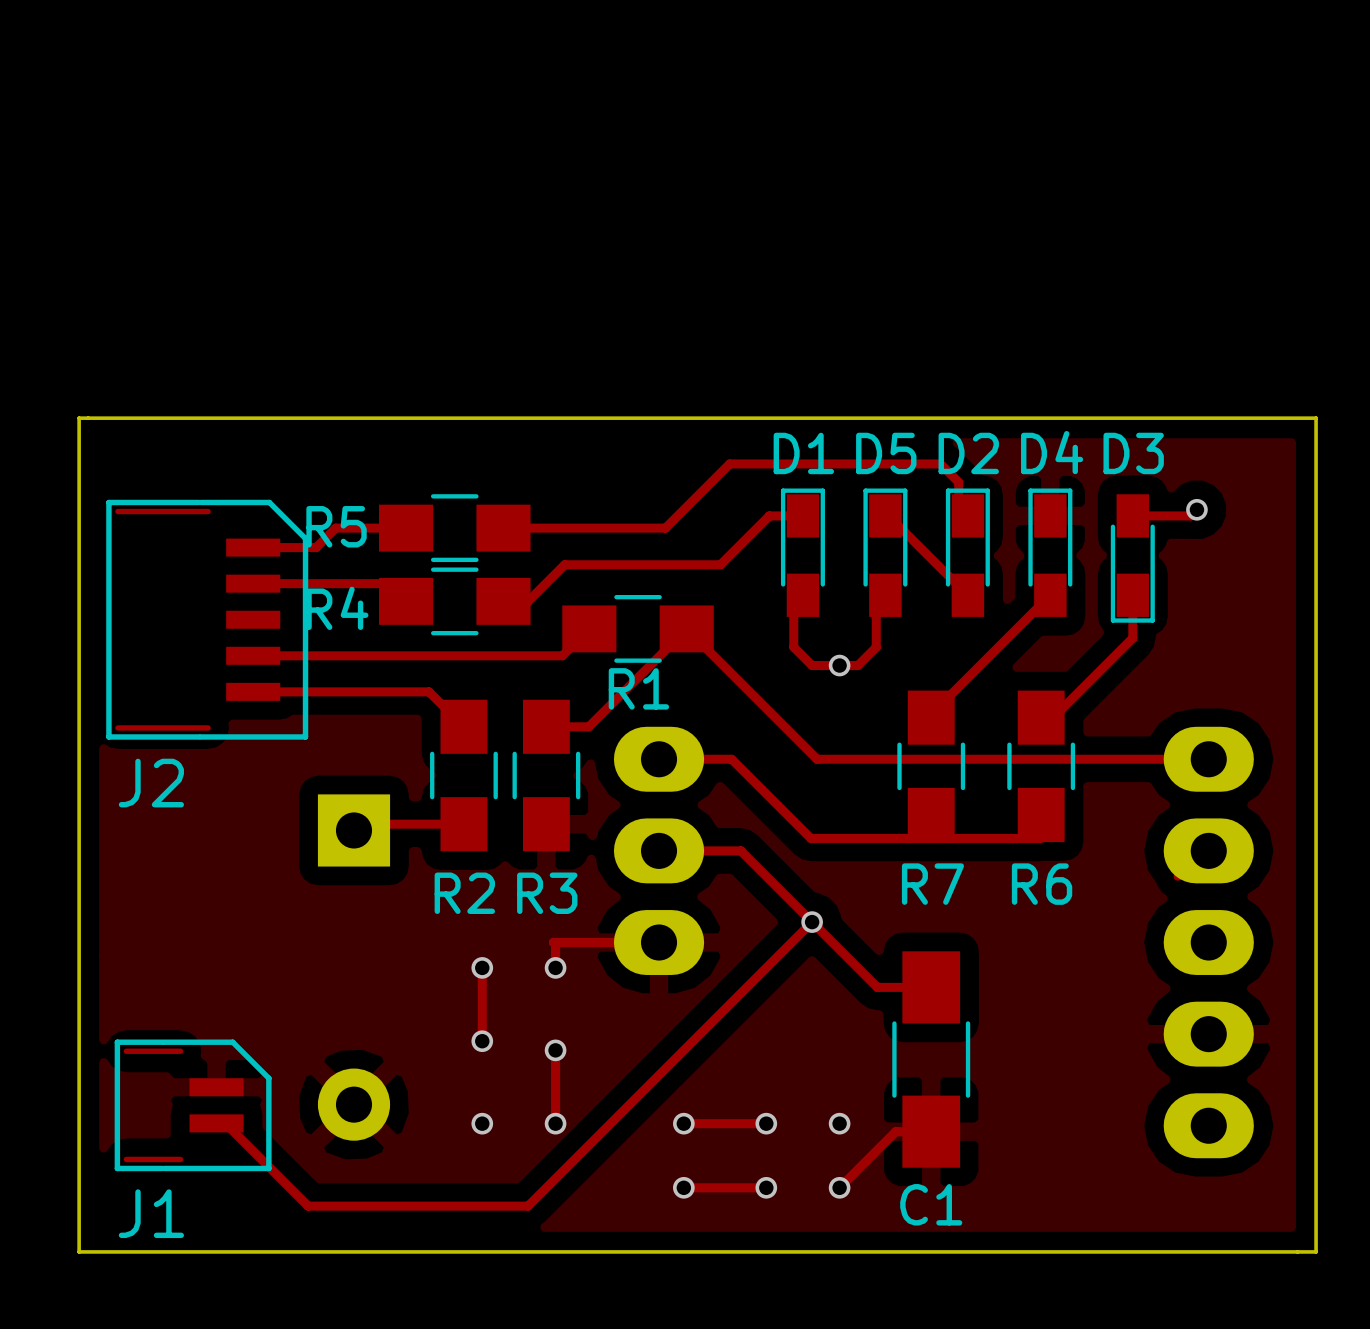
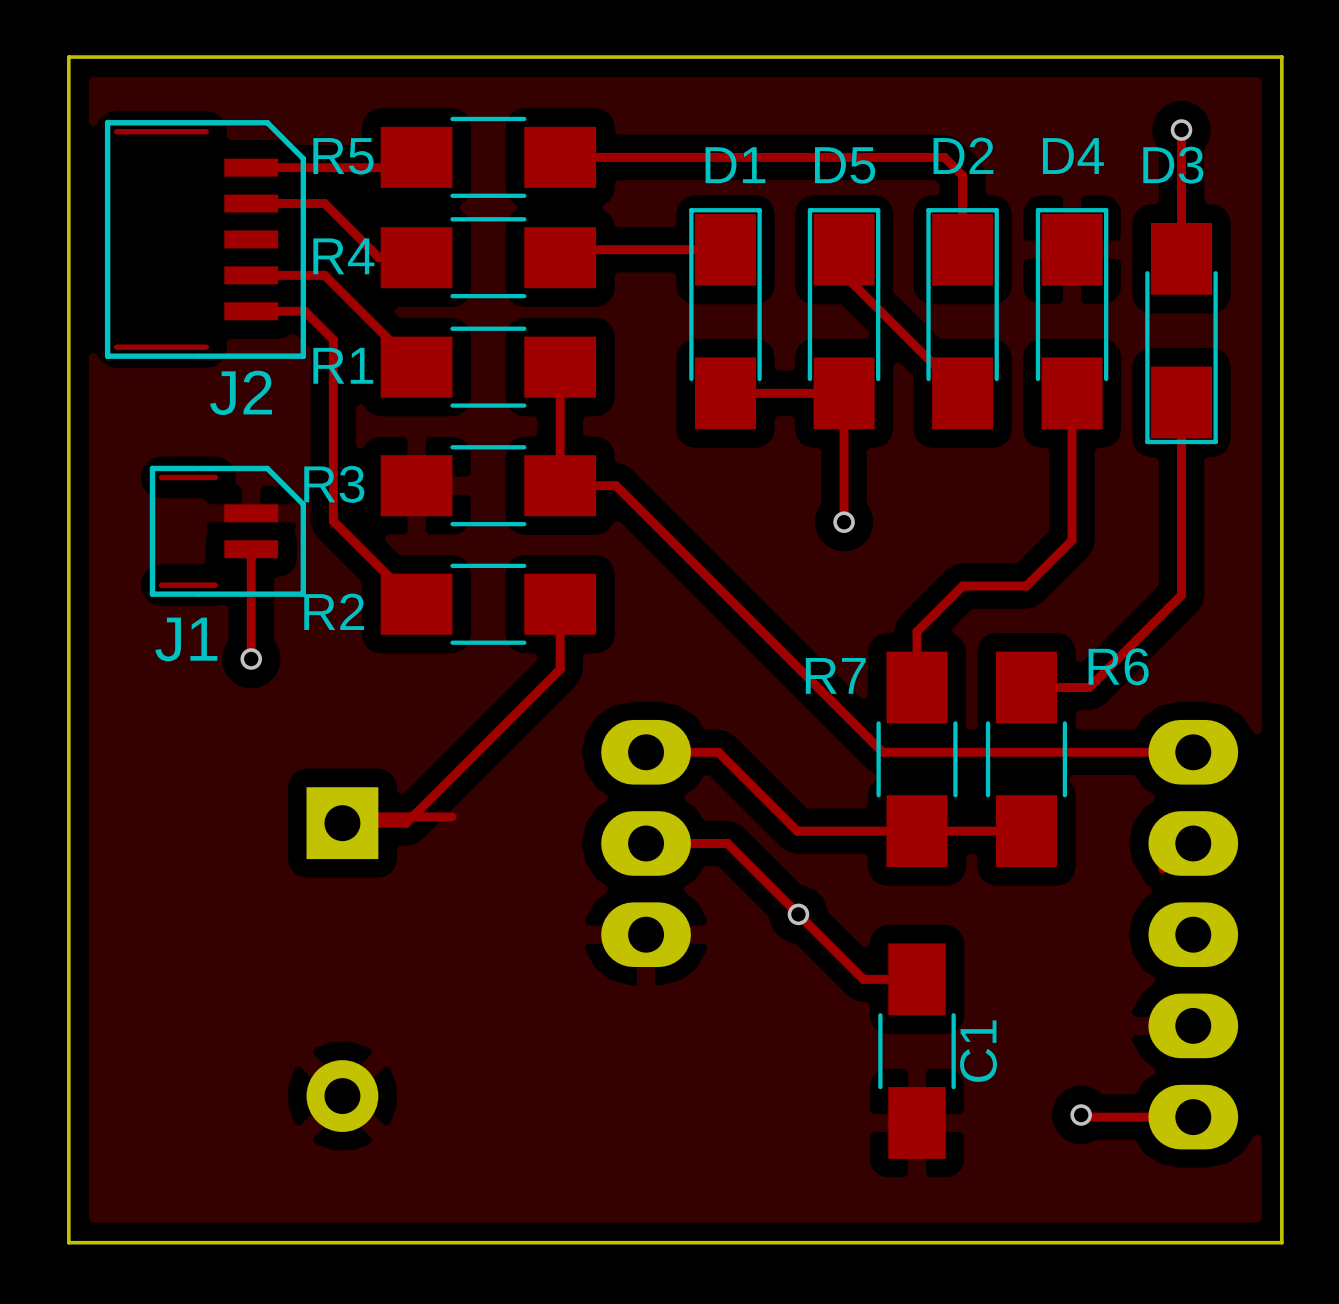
track: none -> (1181, 130) (1181, 258)
via: none -> (1181, 130)
track: none -> (416, 157) (406, 167) (251, 167)
track: none -> (560, 157) (944, 157) (962, 175) (962, 249)
track: none -> (251, 203) (324, 203) (378, 257) (416, 257) (406, 267)
track: none -> (560, 257) (568, 249) (725, 249) (725, 266)
track: none -> (853, 258) (844, 249) (844, 274) (962, 393)
track: none -> (251, 275) (324, 275) (416, 367)
track: none -> (251, 311) (304, 311) (333, 339) (333, 521) (416, 604)
track: none -> (844, 385) (844, 522)
track: none -> (725, 393) (844, 393)
track: none -> (1072, 393) (1072, 540) (1026, 586) (962, 586) (917, 631) (917, 687)
track: none -> (1181, 402) (1181, 595) (1089, 687) (1026, 687)
board edge: (79, 418) (1316, 418) (1316, 1251) (1297, 1251) -> (68, 412) (68, 57) (1281, 57) (1281, 1242)
D1 footprint: [780, 488, 825, 617] -> [689, 208, 762, 430]
D5 footprint: [863, 488, 908, 617] -> [807, 208, 881, 430]
D2 footprint: [945, 488, 990, 617] -> [926, 208, 999, 430]
D4 footprint: [1028, 488, 1073, 617] -> [1035, 208, 1109, 430]
R5 footprint: [379, 494, 531, 563] -> [380, 116, 597, 198]
D3 footprint: [1110, 494, 1155, 623] -> [1145, 222, 1218, 445]
track: (1196, 509) (1190, 515) (1123, 515) -> none
via: (1196, 509) -> none
track: (793, 515) (769, 515) (720, 564) (564, 564) (528, 601) (503, 601) -> none
track: (885, 515) (888, 515) (967, 595) -> none
track: (958, 515) (958, 482) (940, 463) (729, 463) (665, 528) (503, 528) -> none
track: (406, 528) (335, 528) (316, 547) (253, 547) -> none
track: none -> (251, 549) (251, 658)
R4 footprint: [379, 567, 531, 636] -> [380, 217, 597, 299]
track: (253, 583) (388, 583) (406, 601) -> none
R1 footprint: [562, 594, 714, 663] -> [380, 326, 597, 408]
track: (793, 595) (793, 647) (812, 665) (857, 665) (876, 647) (876, 595) -> none
track: (1050, 595) (931, 714) (931, 717) -> none
track: (1132, 595) (1132, 638) (1053, 717) (1041, 717) -> none
track: none -> (560, 604) (560, 669) (406, 823) (342, 823)
J2 position: (207, 619) -> (205, 239)
track: (589, 628) (562, 655) (253, 655) -> none
via: none -> (251, 658)
via position: (839, 665) -> (844, 522)
R1 name position: R1 (638, 688) -> R1 (343, 365)
R7 footprint: [897, 690, 966, 843] -> [876, 651, 958, 868]
R6 footprint: [1007, 690, 1076, 843] -> [985, 651, 1068, 868]
track: (253, 691) (429, 691) (463, 726) -> none
R2 footprint: [430, 699, 498, 852] -> [380, 563, 597, 645]
R3 footprint: [512, 699, 581, 852] -> [380, 445, 597, 527]
track: (546, 726) (588, 726) (686, 628) (817, 759) (896, 759) -> (560, 367) (560, 485) (616, 485) (882, 752)
J2 name position: J2 (151, 783) -> J2 (241, 392)
R7 name position: R7 (932, 884) -> R7 (835, 675)
R6 name position: R6 (1042, 884) -> R6 (1118, 666)
R2 name position: R2 (464, 893) -> R2 (334, 611)
R3 name position: R3 (547, 893) -> R3 (334, 484)
track: (812, 922) (528, 1206) (308, 1206) (225, 1123) (216, 1123) -> none
track: (659, 942) (553, 942) (555, 944) (555, 967) -> none
track: (482, 967) (482, 1041) -> none
via: (482, 967) -> none
via: (555, 967) -> none
via: (482, 1041) -> none
track: (555, 1050) (555, 1123) -> none
via: (555, 1050) -> none
J1 position: (193, 1105) -> (227, 531)
via: (482, 1123) -> none
via: (555, 1123) -> none
track: (683, 1123) (766, 1123) -> none
via: (683, 1123) -> none
via: (766, 1123) -> none
via: (839, 1123) -> none
track: none -> (1081, 1115) (1083, 1117) (1193, 1117)
via: none -> (1081, 1115)
track: (931, 1131) (895, 1131) (839, 1187) -> none
track: (683, 1187) (766, 1187) -> none
via: (683, 1187) -> none
via: (766, 1187) -> none
via: (839, 1187) -> none
C1 name rotation: 0° (931, 1204) -> 90° counterclockwise (978, 1051)
C1 name position: C1 (931, 1204) -> C1 (978, 1051)

